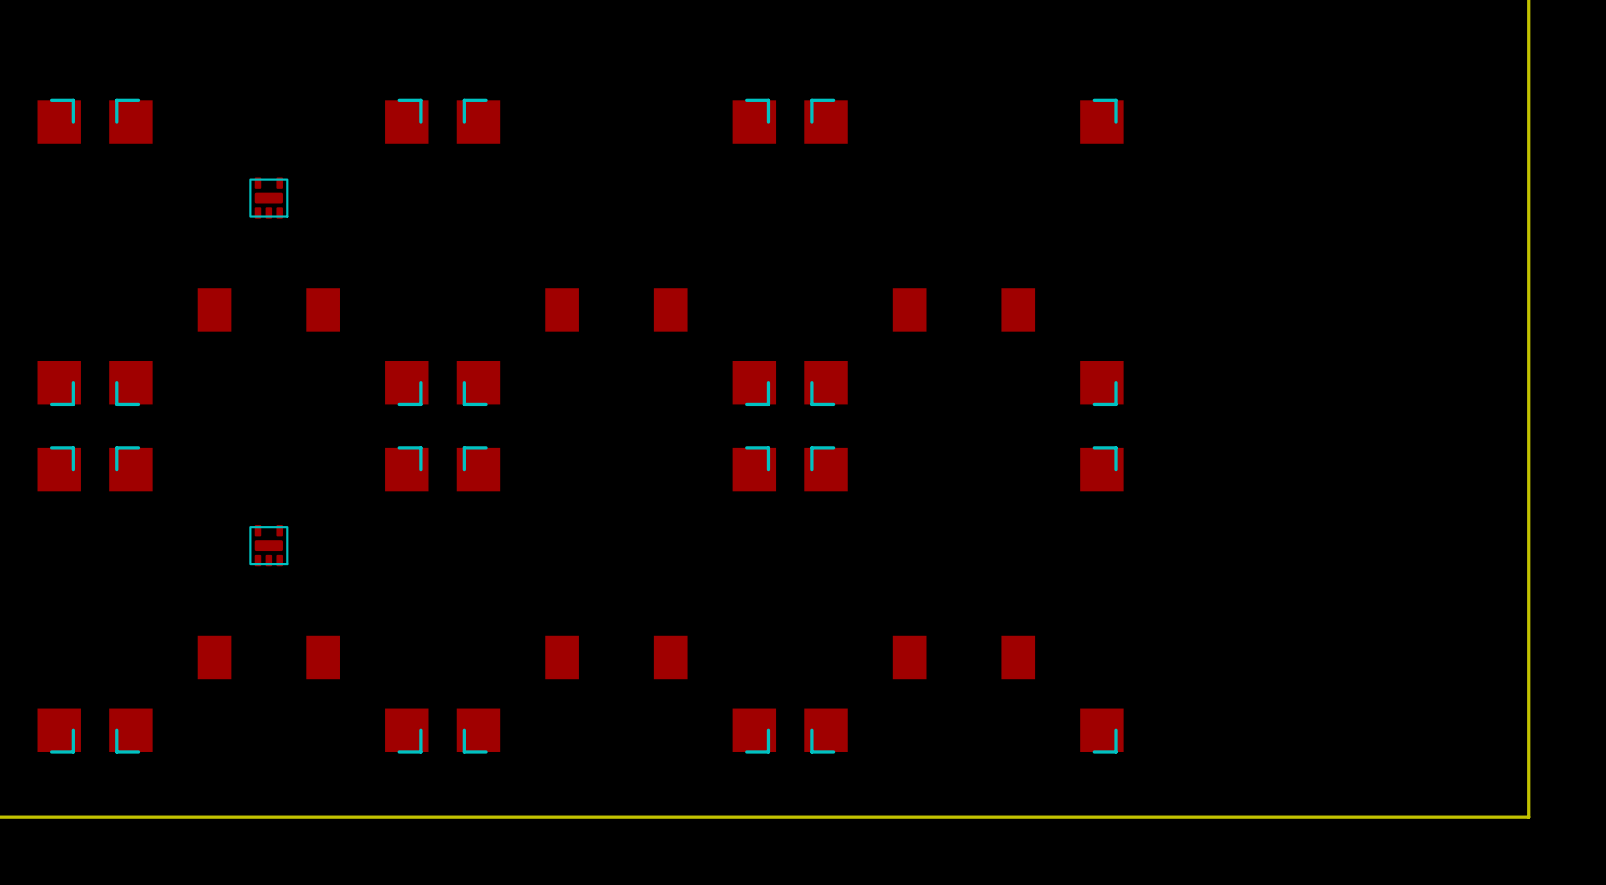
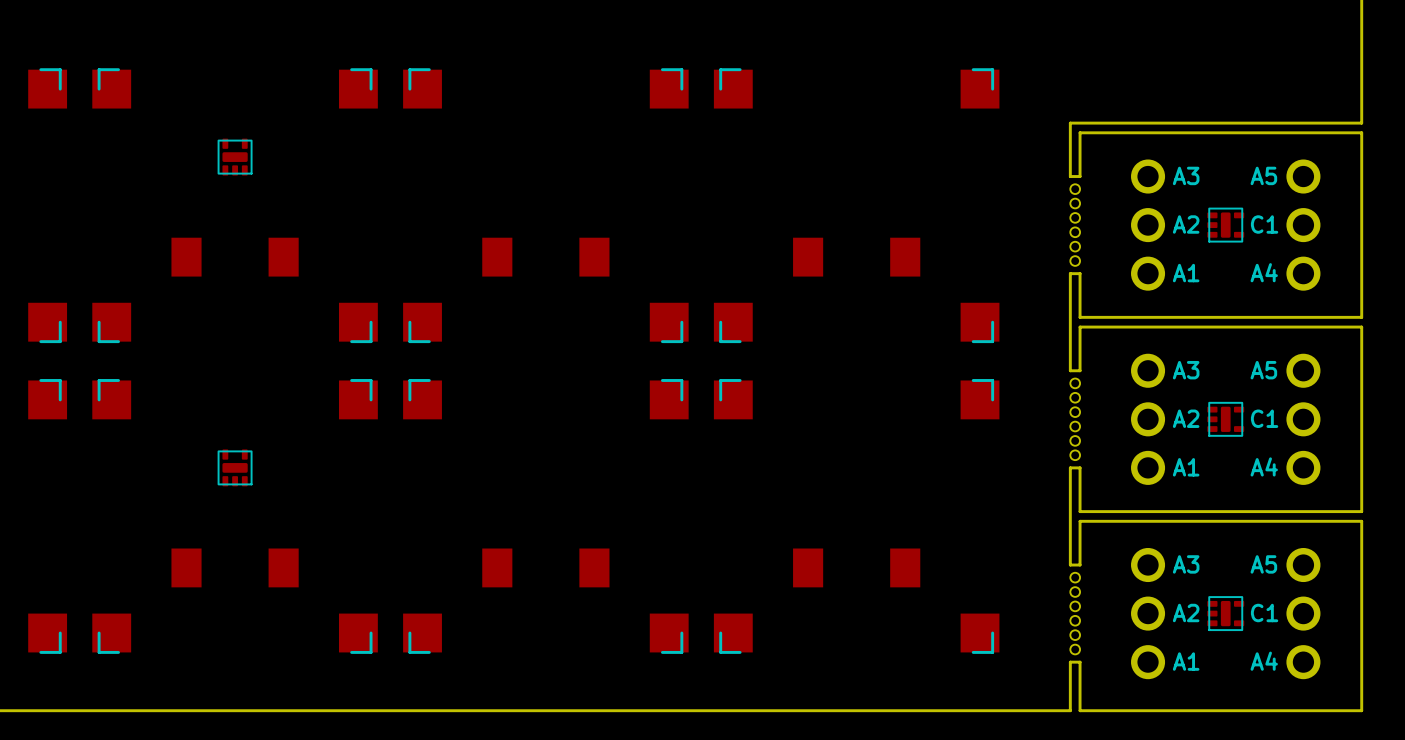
board edge: (1528, 160) (1528, 170) -> (1361, 123) (1070, 123) (1070, 176) (1080, 176) (1080, 132) (1361, 132)
part: none -> (1075, 225)
part: none -> (1225, 225)
part: none -> (1225, 225)
board edge: (1528, 377) (1528, 388) -> (1361, 317) (1080, 317) (1080, 273) (1070, 273) (1070, 370) (1080, 370) (1080, 327) (1361, 327)
part: none -> (1075, 419)
part: none -> (1225, 419)
part: none -> (1225, 419)
board edge: (1528, 594) (1528, 605) -> (1361, 511) (1080, 511) (1080, 467) (1070, 467) (1070, 565) (1080, 565) (1080, 521) (1361, 521)
part: none -> (1075, 613)
part: none -> (1225, 613)
part: none -> (1225, 613)
board edge: (1202, 817) (1213, 817) -> (1070, 710) (1070, 662) (1080, 662) (1080, 710)

